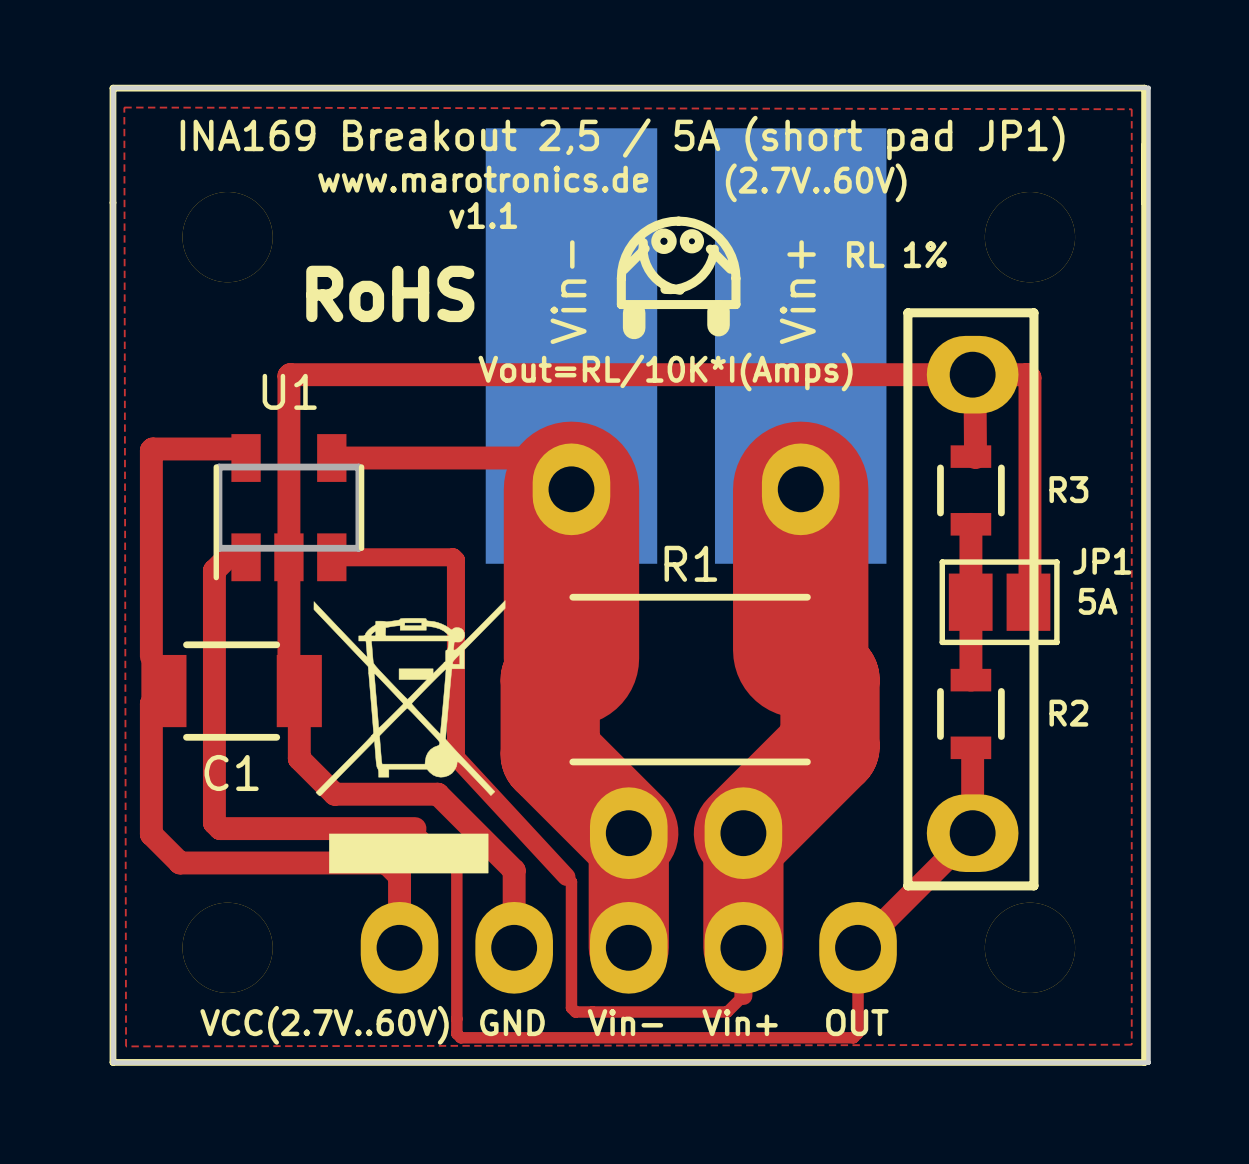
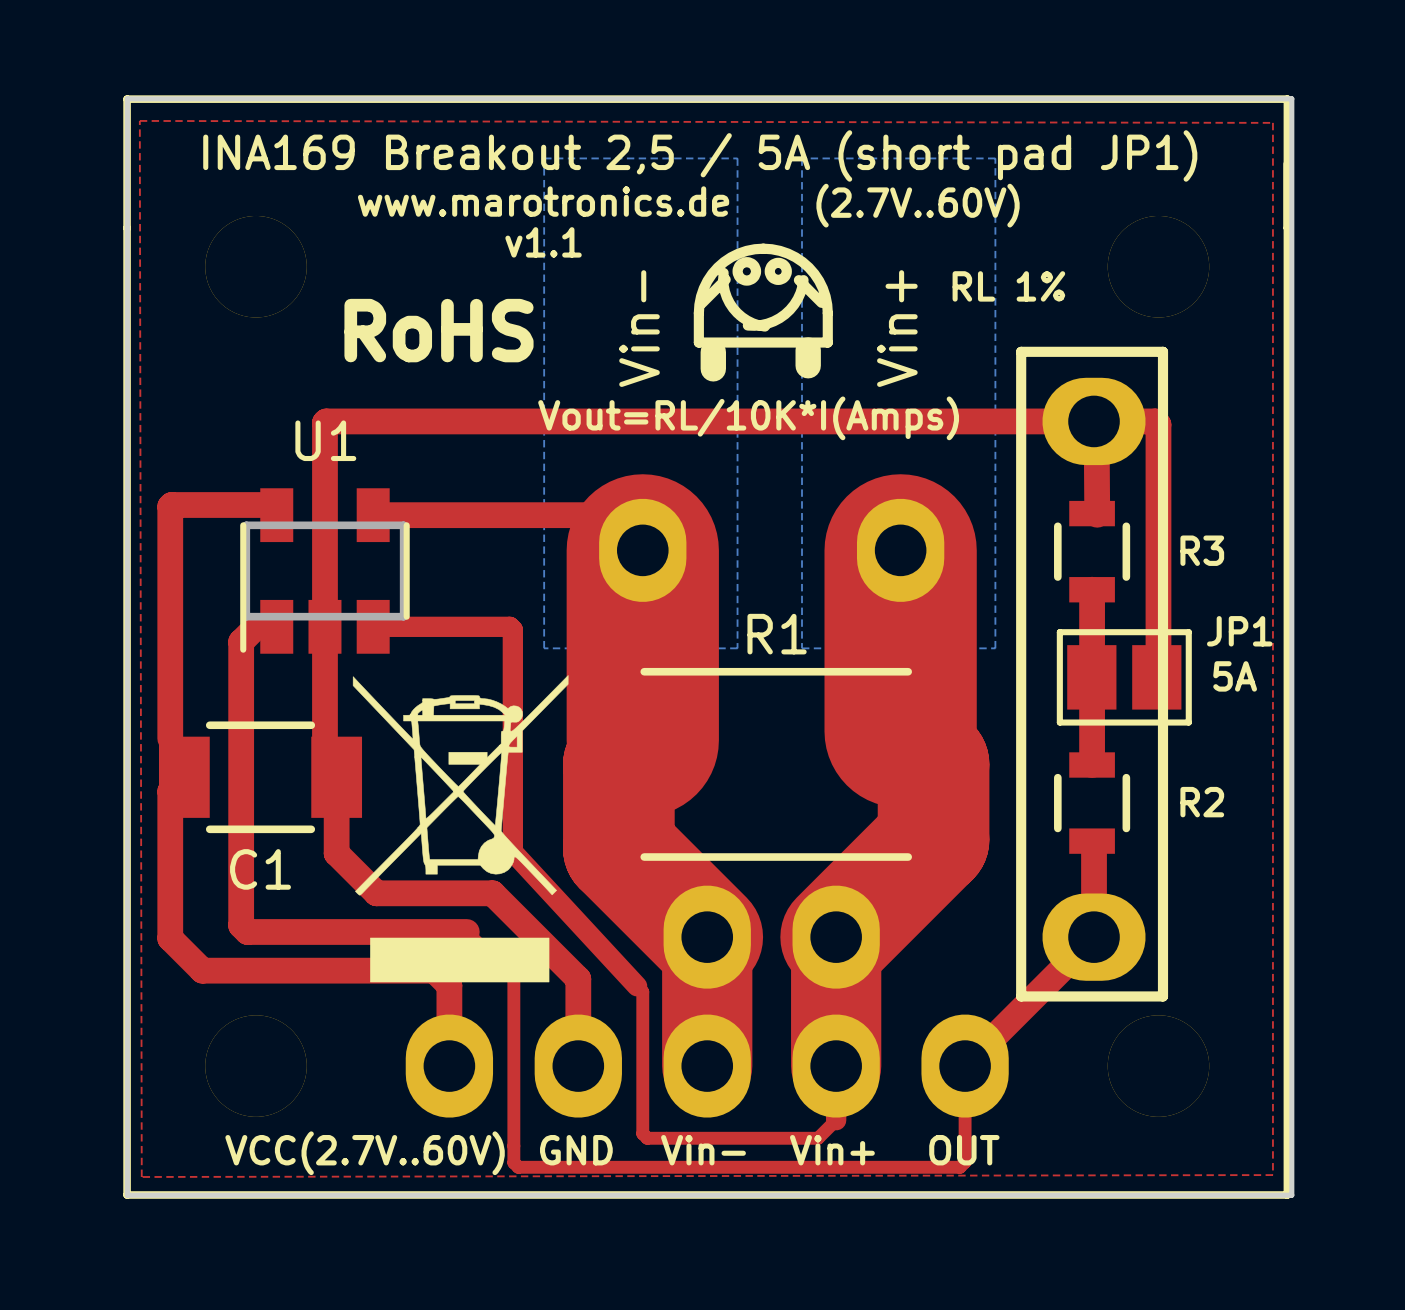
part footprint: [109, 84, 1148, 1066] -> [123, 95, 1292, 1199]
bottom zone outline: none -> (544, 158) (544, 648) (737, 648) (737, 158) (544, 158)
bottom zone outline: none -> (802, 158) (995, 158) (995, 648) (802, 648) (802, 158)

